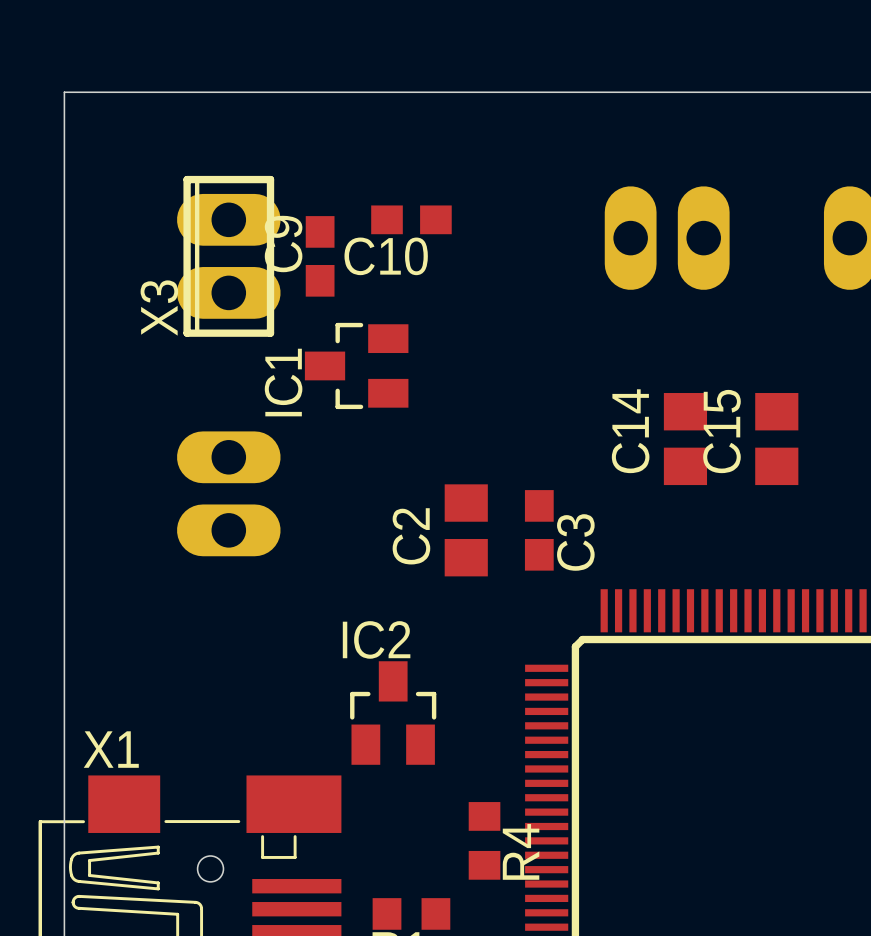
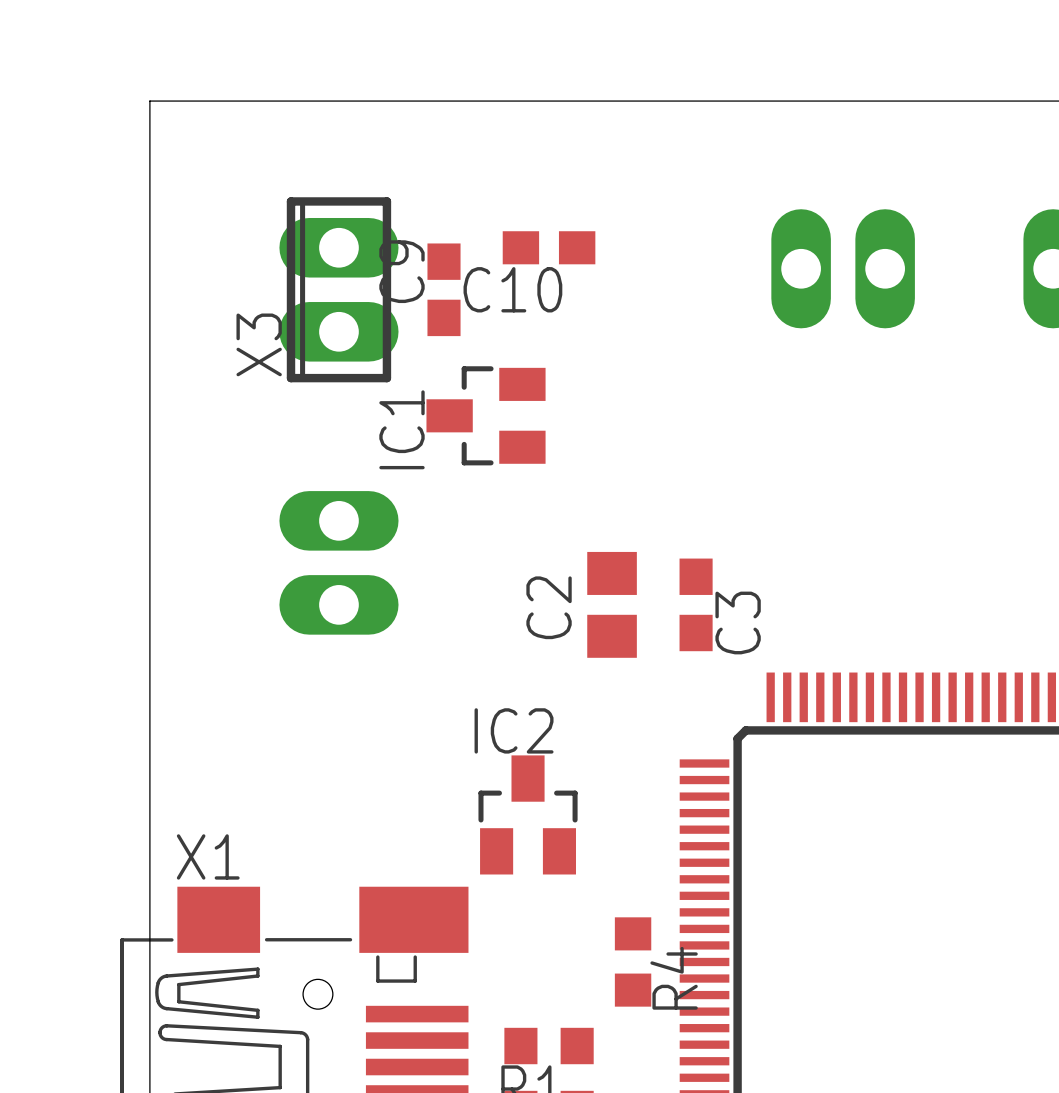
C14: (685, 439) -> none
C15: (776, 439) -> none

